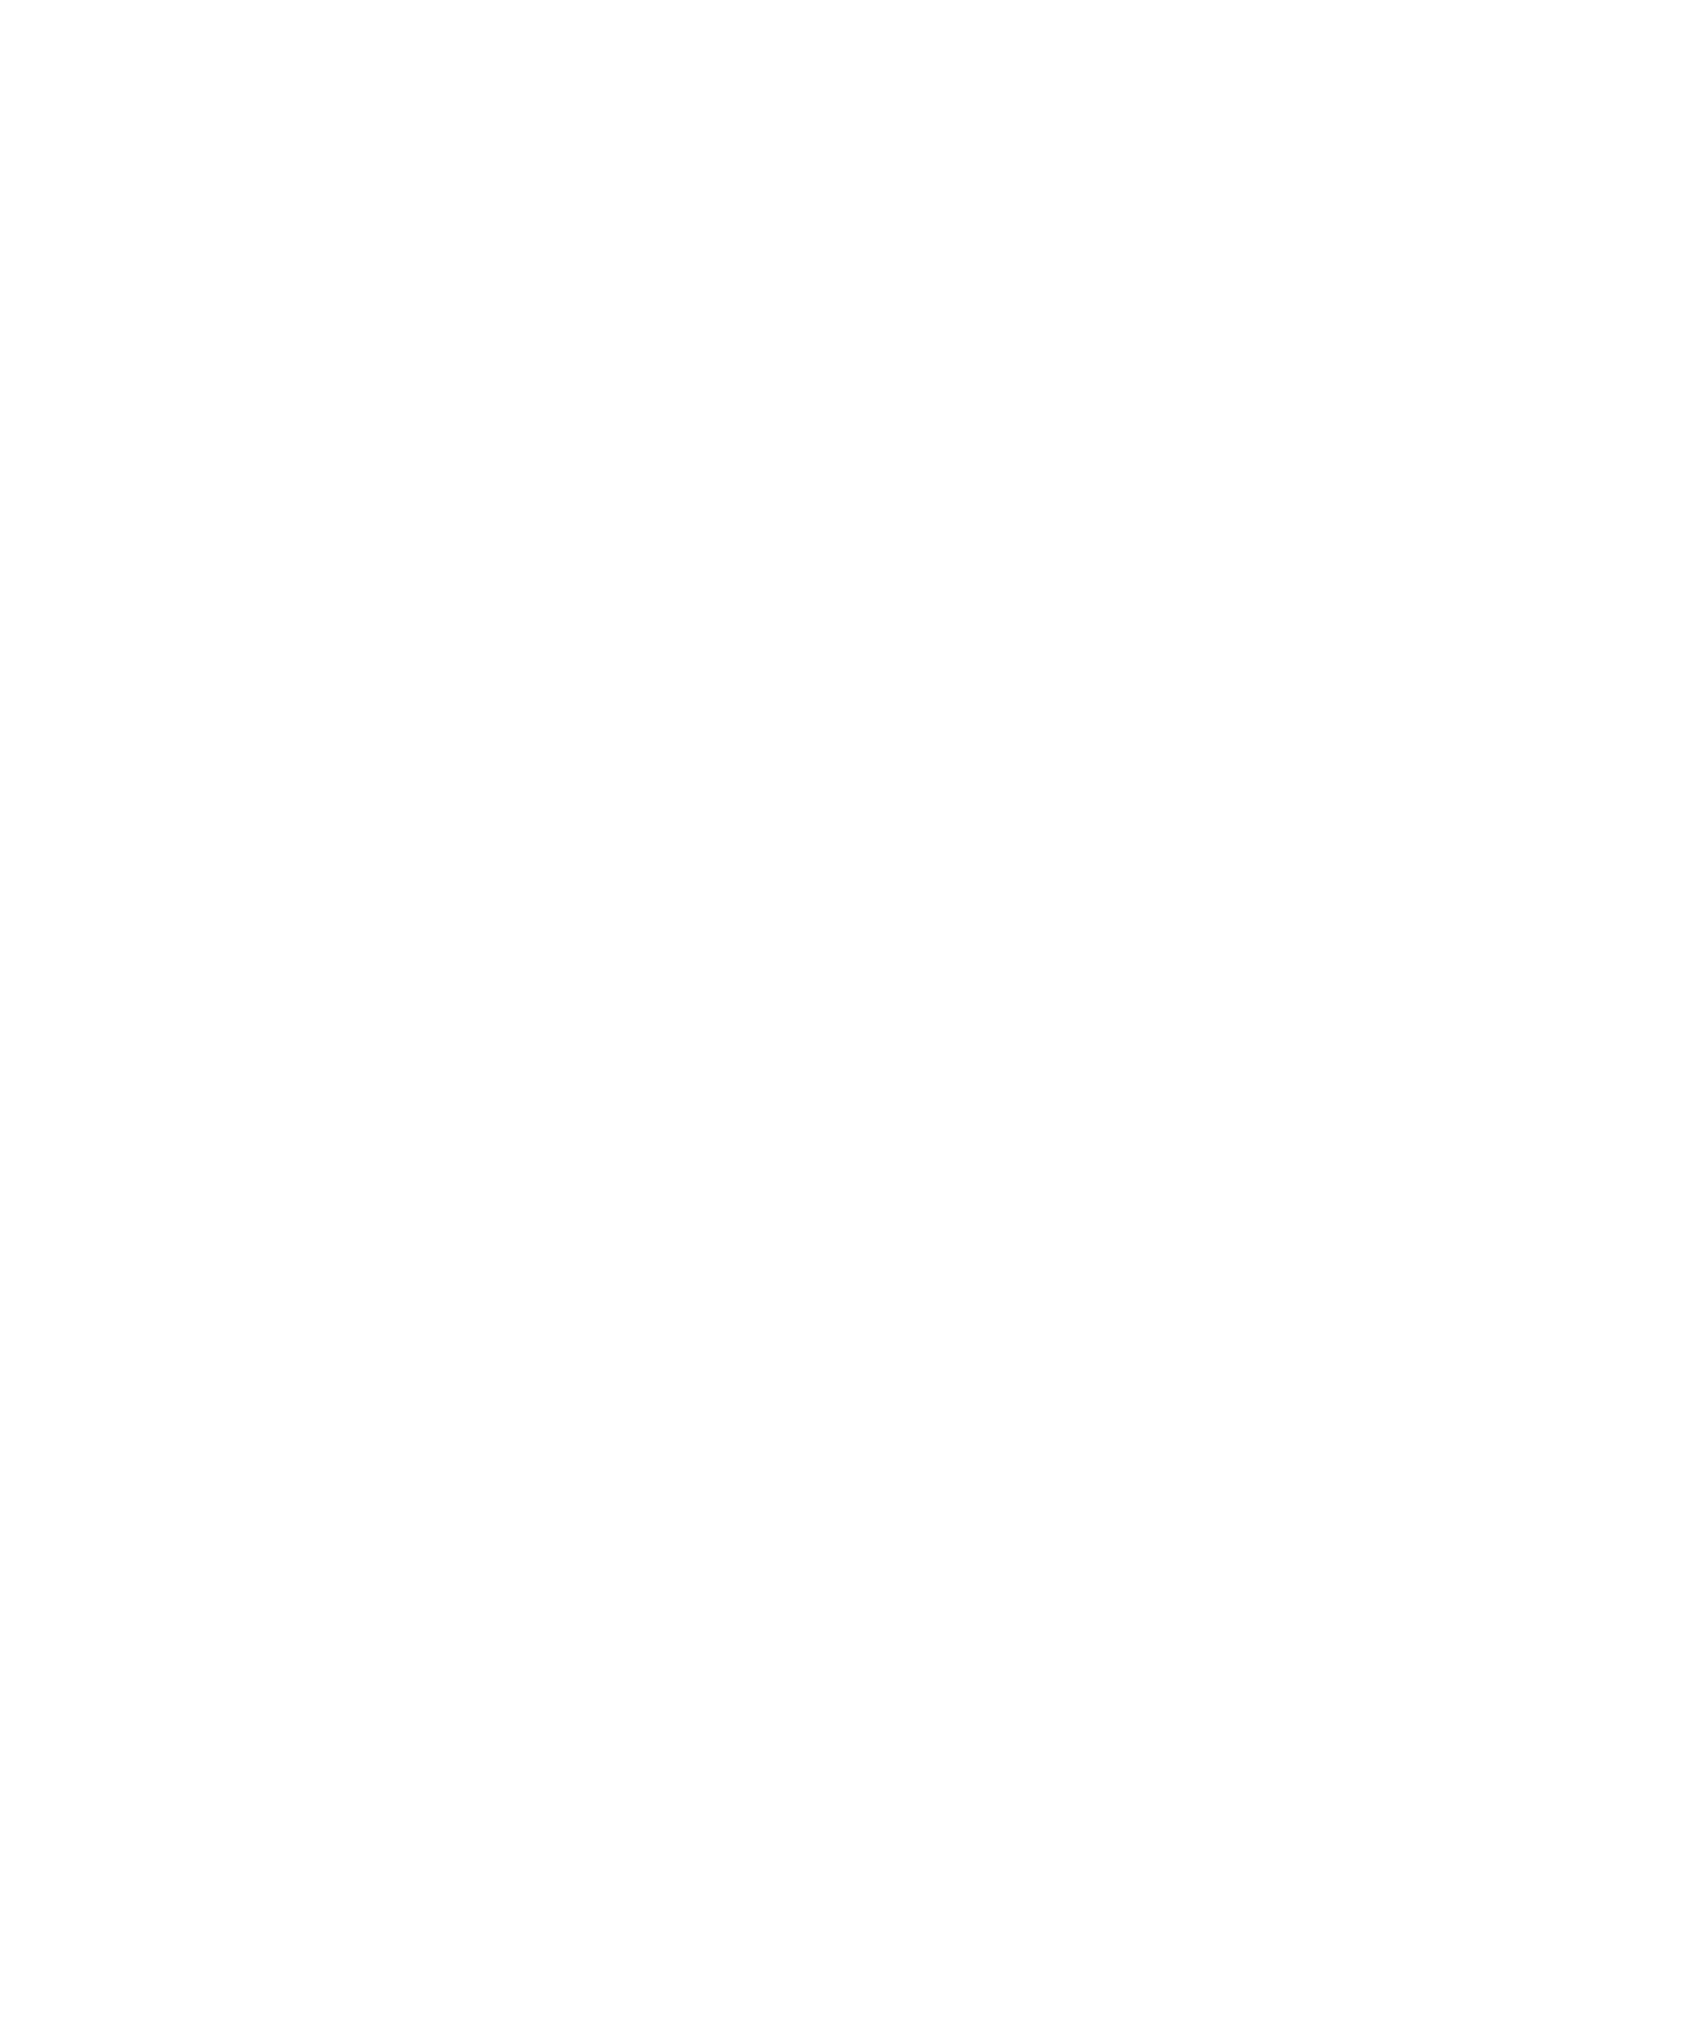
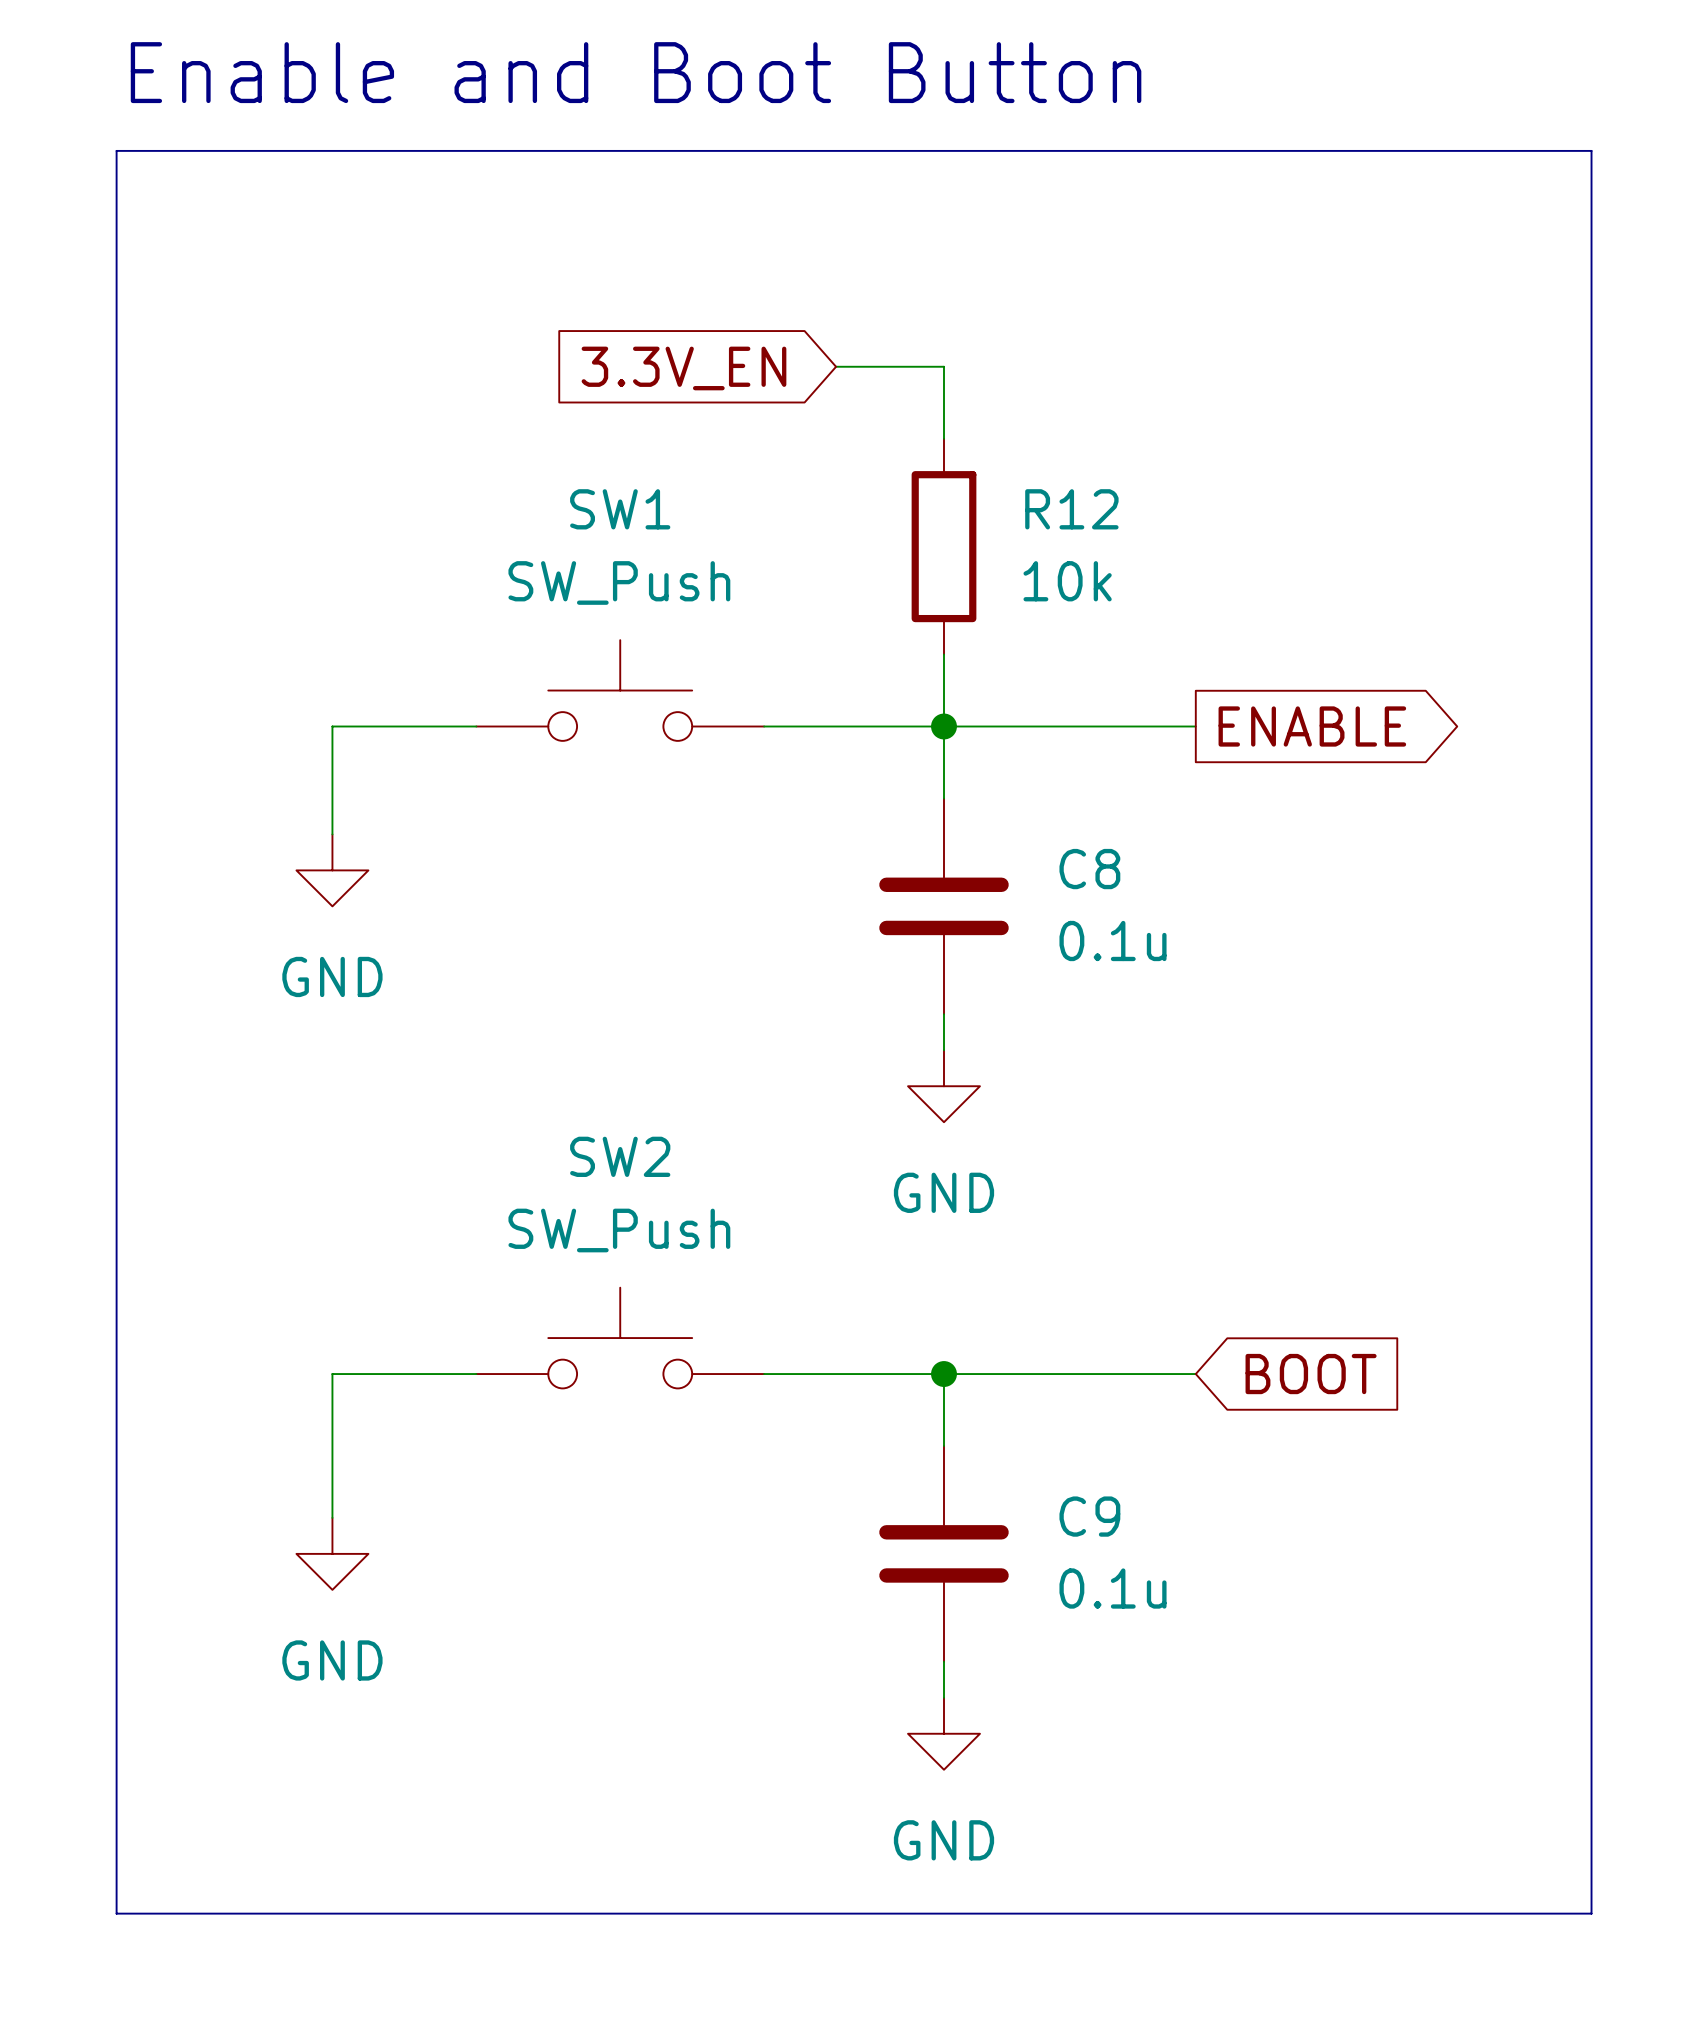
text: none -> Enable and Boot Button (636, 72)
line: none -> (116, 150) (1591, 150) (1591, 1913) (116, 1913) (116, 150)
wire: none -> (836, 366) (943, 366) (943, 438)
global label: none -> 3.3V_EN (683, 368)
R12: none -> 10k (943, 546)
wire: none -> (943, 654) (943, 798)
SW1: none -> SW_Push (620, 690)
wire: none -> (476, 726) (332, 726) (332, 834)
wire: none -> (764, 726) (1195, 726)
junction: none -> (943, 726)
global label: none -> ENABLE (1312, 726)
power symbol: none -> GND (332, 870)
C8: none -> 0.1u (943, 906)
wire: none -> (943, 1014) (943, 1050)
power symbol: none -> GND (943, 1086)
SW2: none -> SW_Push (620, 1338)
wire: none -> (476, 1374) (332, 1374) (332, 1517)
wire: none -> (764, 1374) (1195, 1374)
wire: none -> (943, 1374) (943, 1445)
junction: none -> (943, 1374)
global label: none -> BOOT (1311, 1374)
power symbol: none -> GND (332, 1553)
C9: none -> 0.1u (943, 1553)
wire: none -> (943, 1661) (943, 1697)
power symbol: none -> GND (943, 1733)

